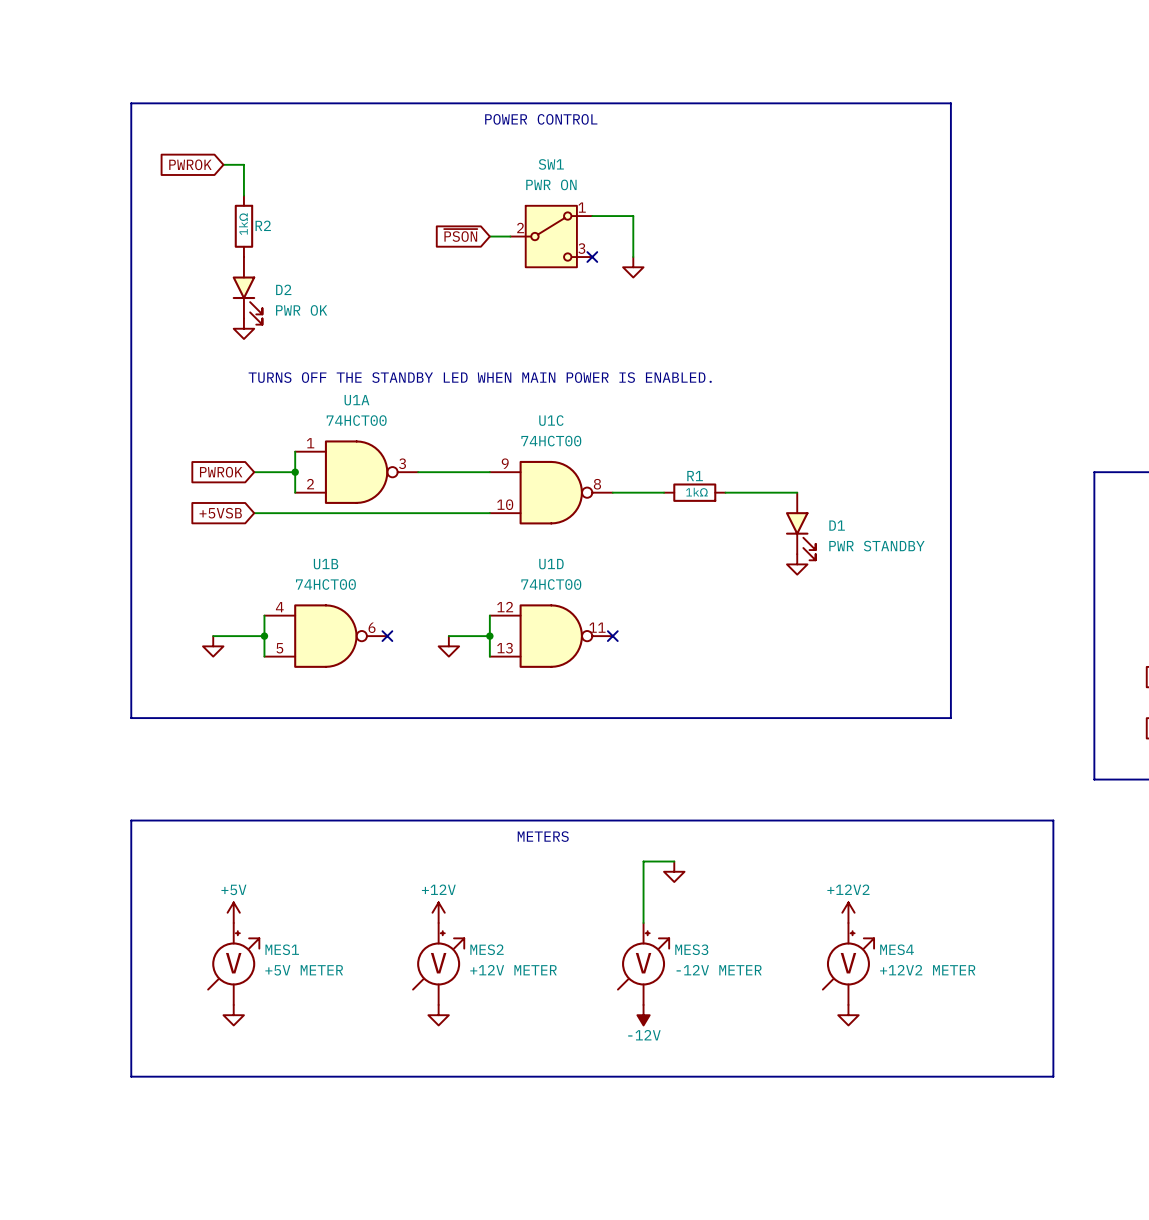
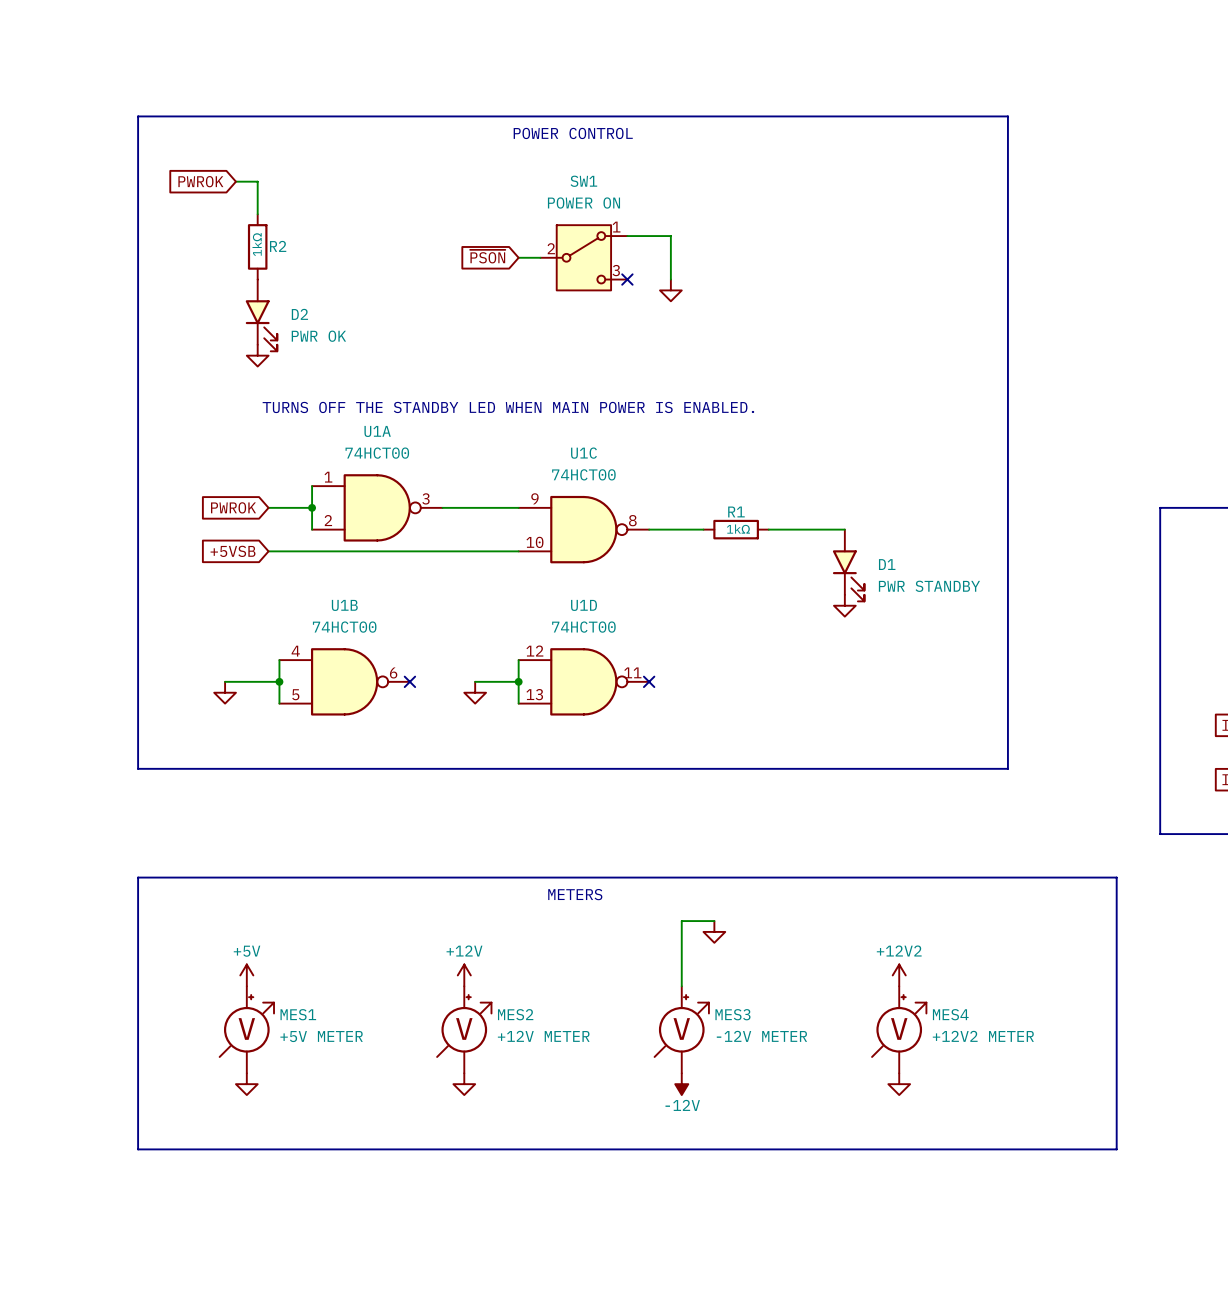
SW1 value: PWR ON (551, 184) -> POWER ON (583, 203)

